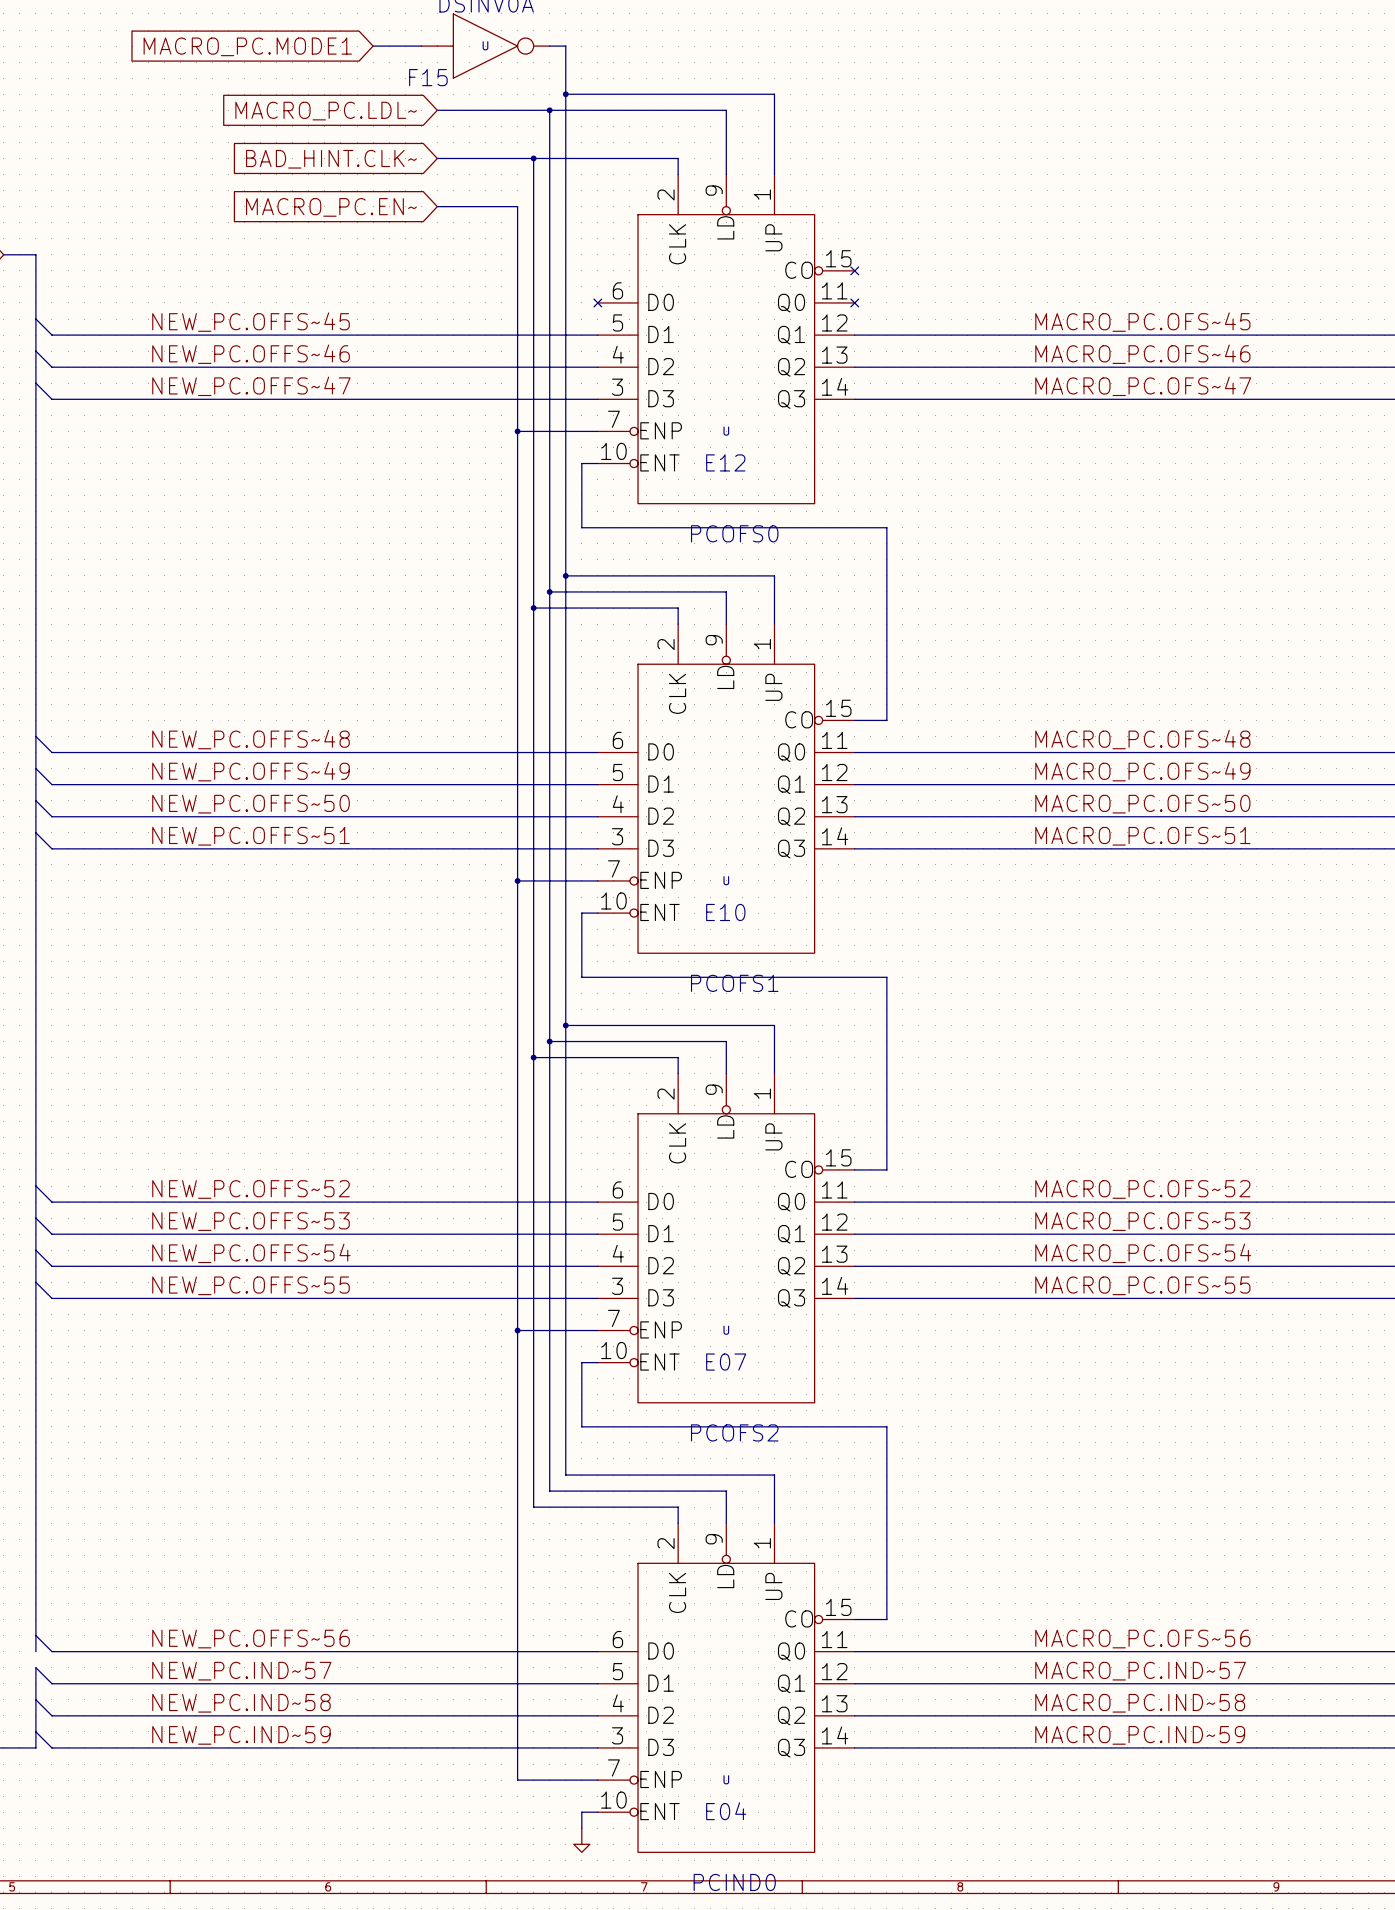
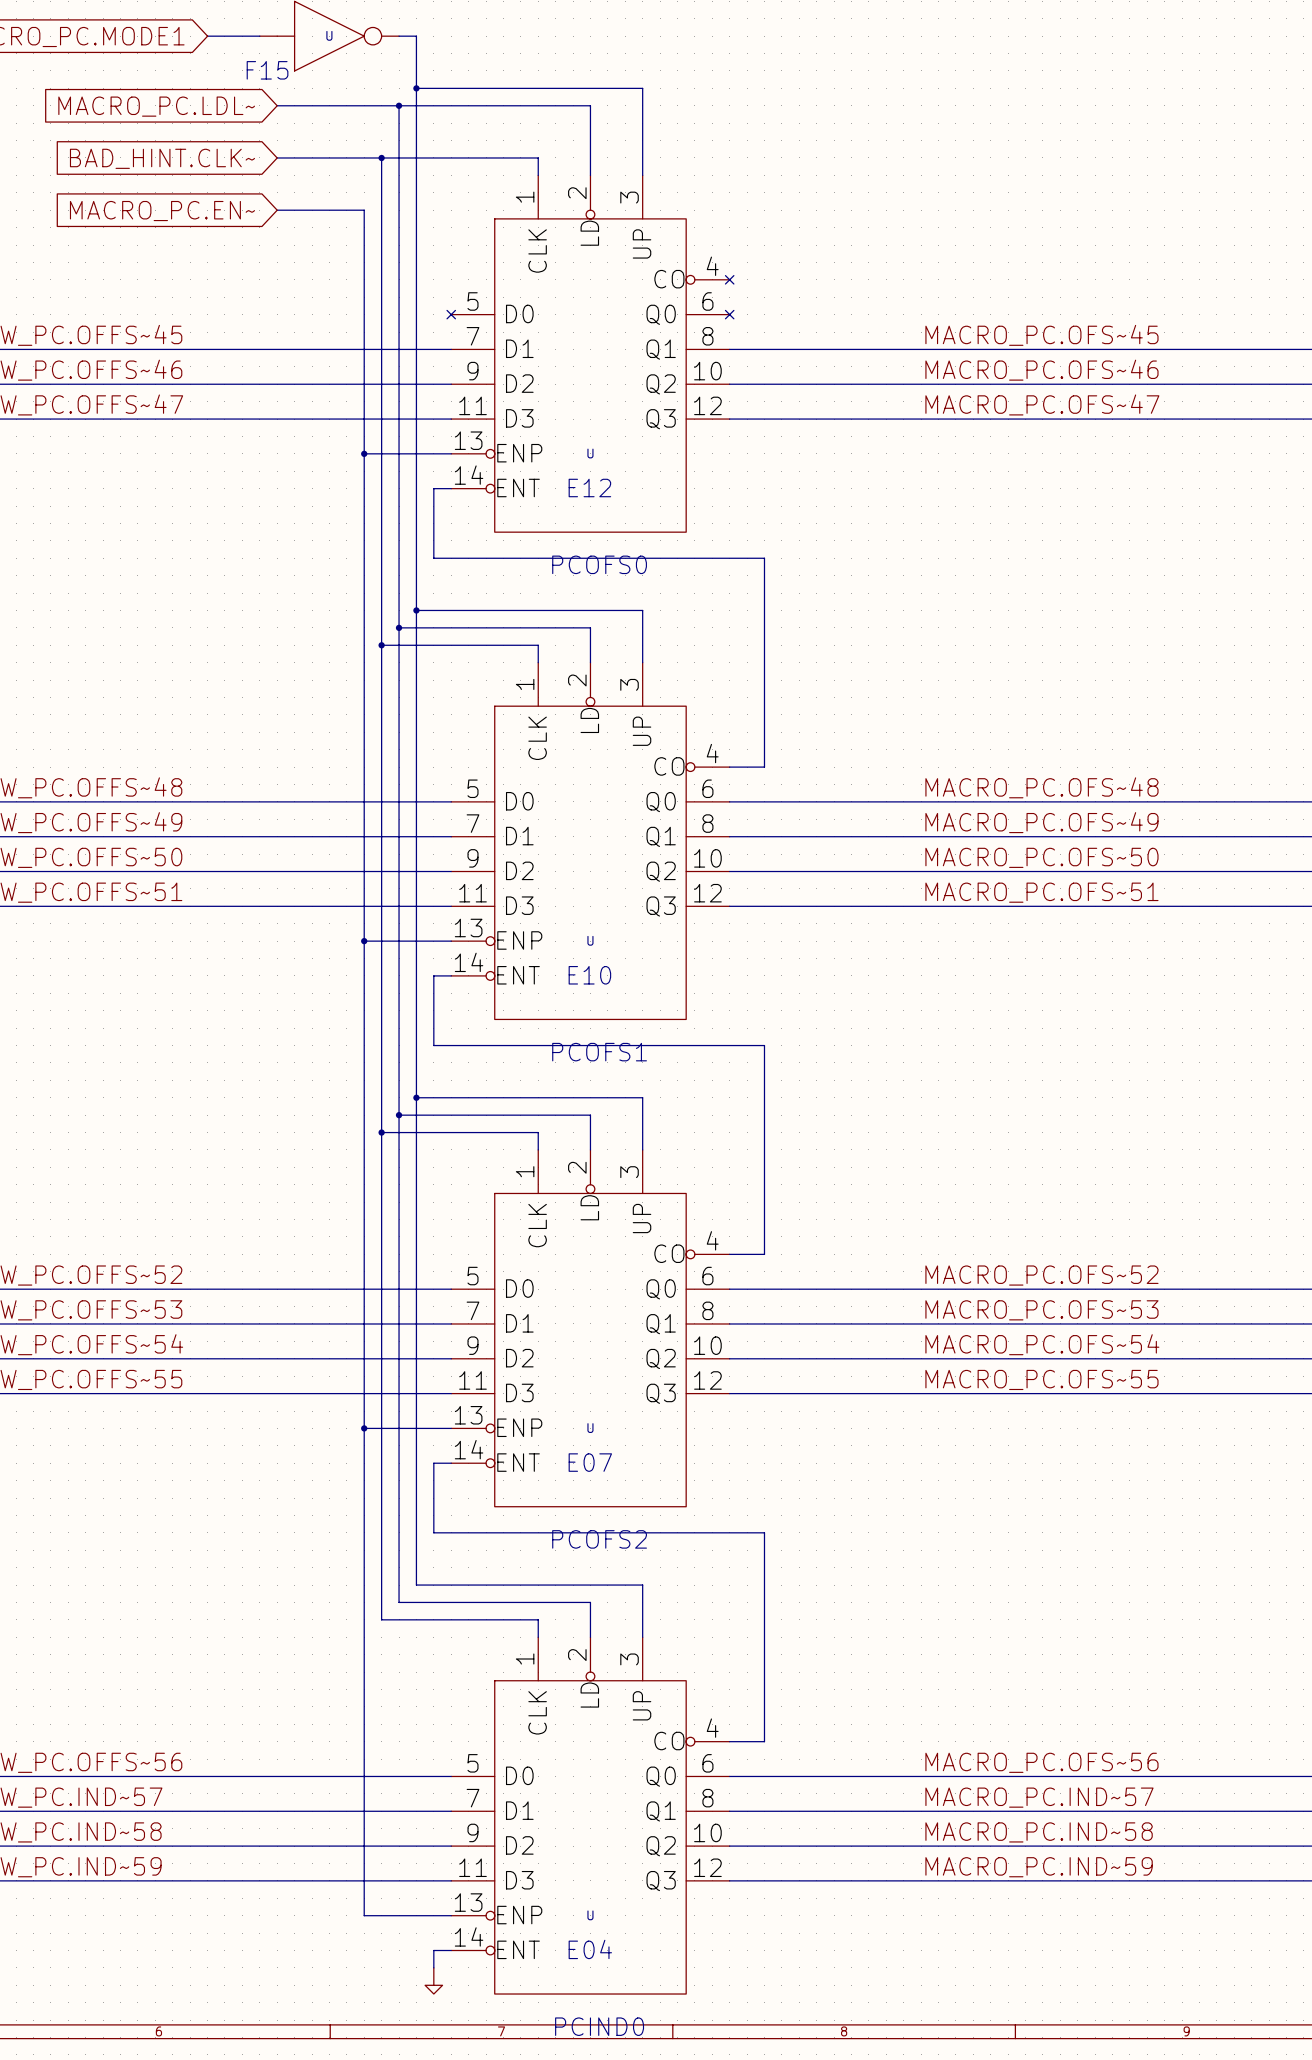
U symbol: [597, 174, 855, 504] -> [451, 175, 730, 533]
U symbol: [597, 624, 855, 954] -> [451, 662, 730, 1020]
U symbol: [597, 1073, 855, 1403] -> [451, 1149, 730, 1507]
U symbol: [597, 1523, 855, 1853] -> [451, 1637, 730, 1995]

